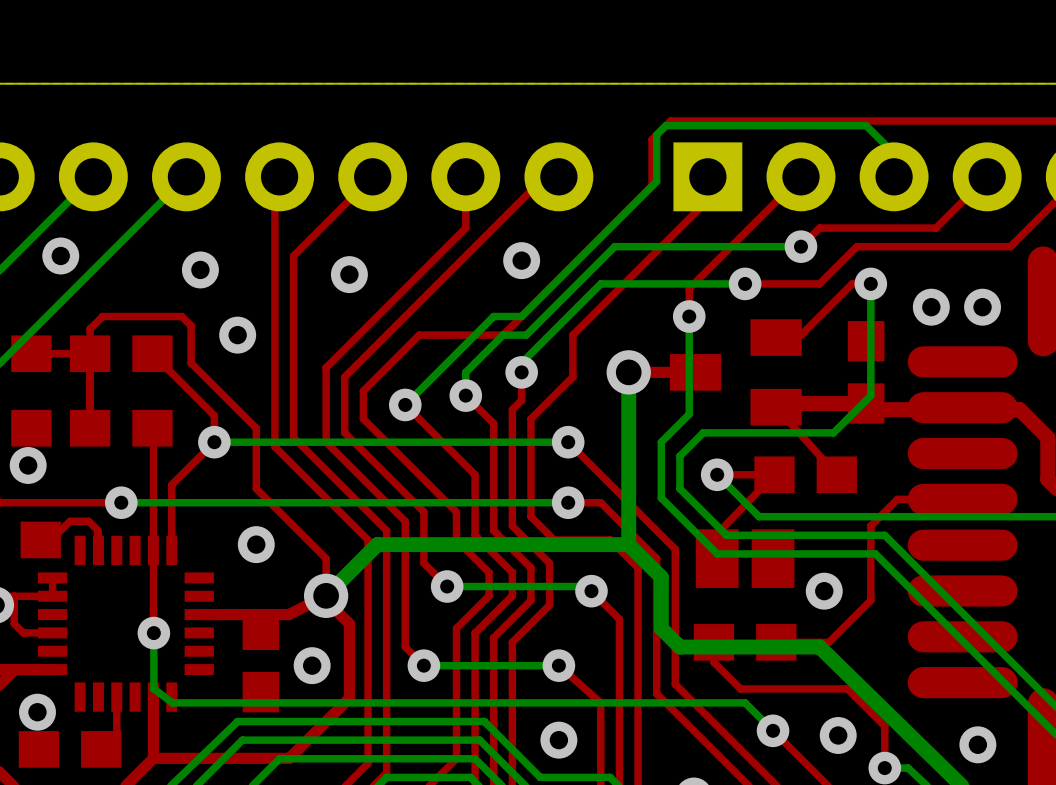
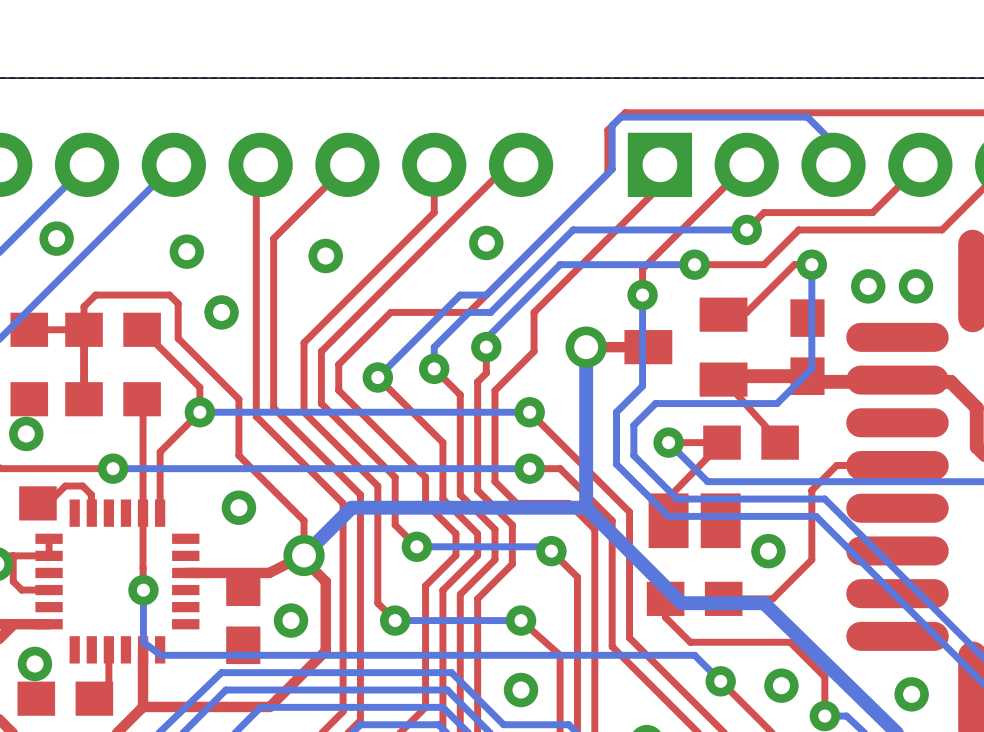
bottom track: (661, 577) (661, 628) (679, 647) (731, 647) -> (616, 538) (681, 603)

